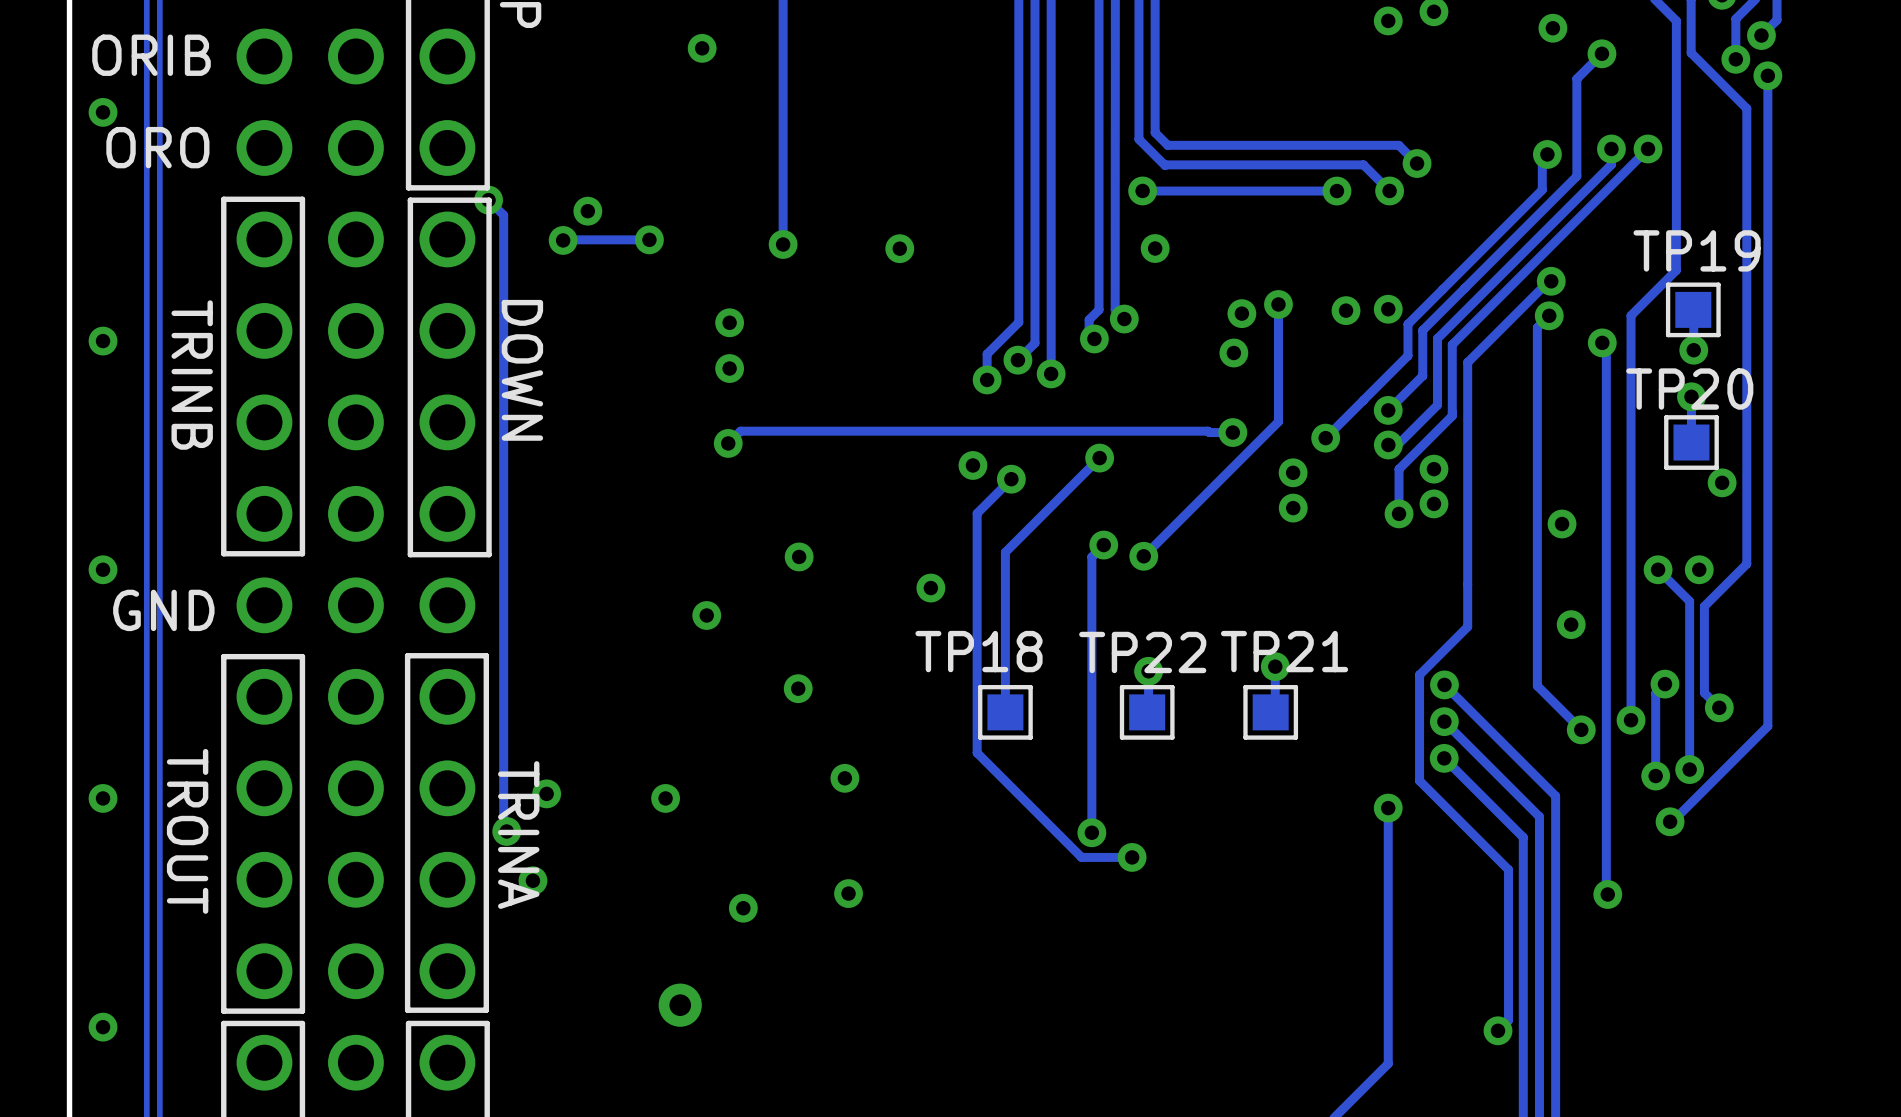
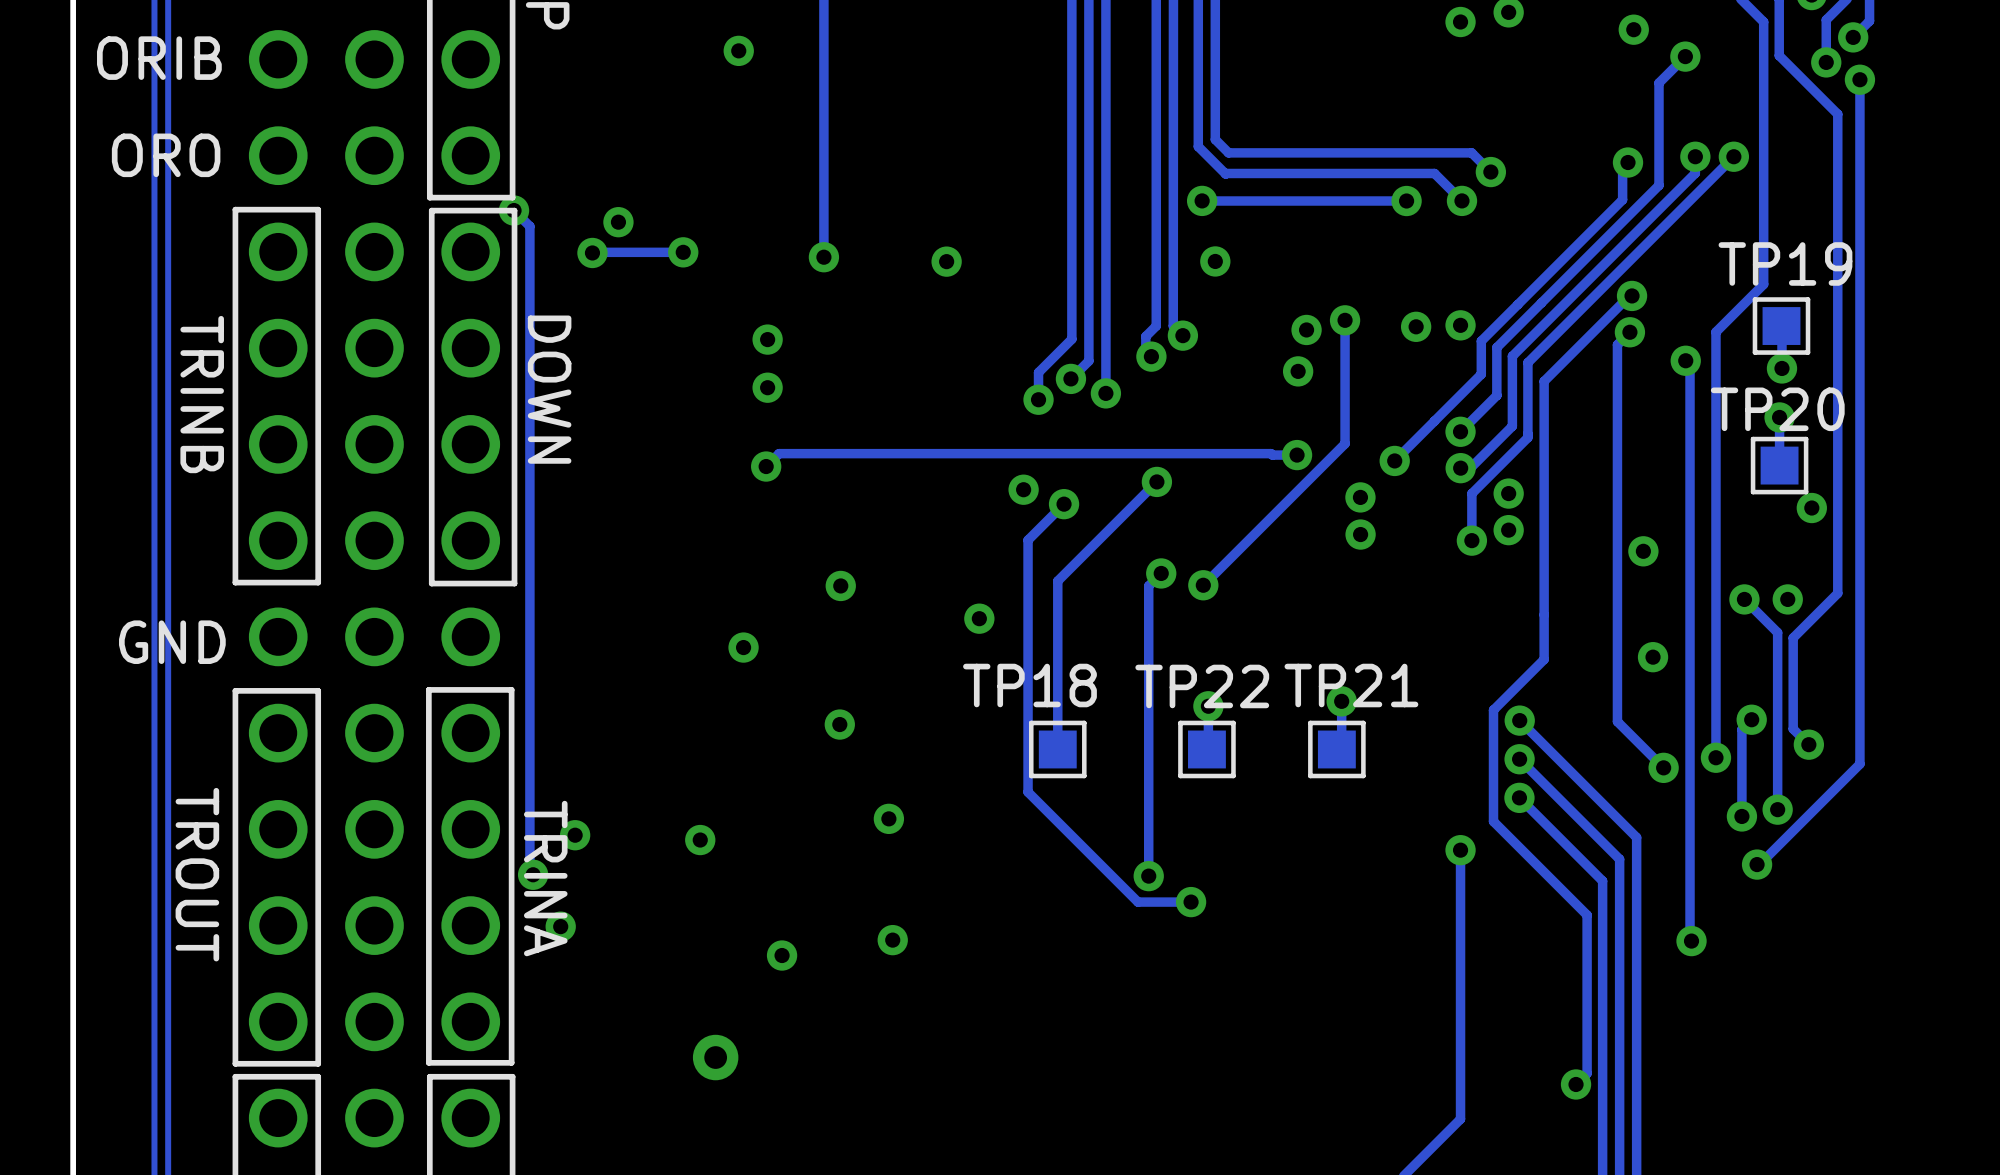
via: (103, 112) -> none
via: (103, 341) -> none
via: (103, 569) -> none
via: (103, 798) -> none
via: (103, 1027) -> none

